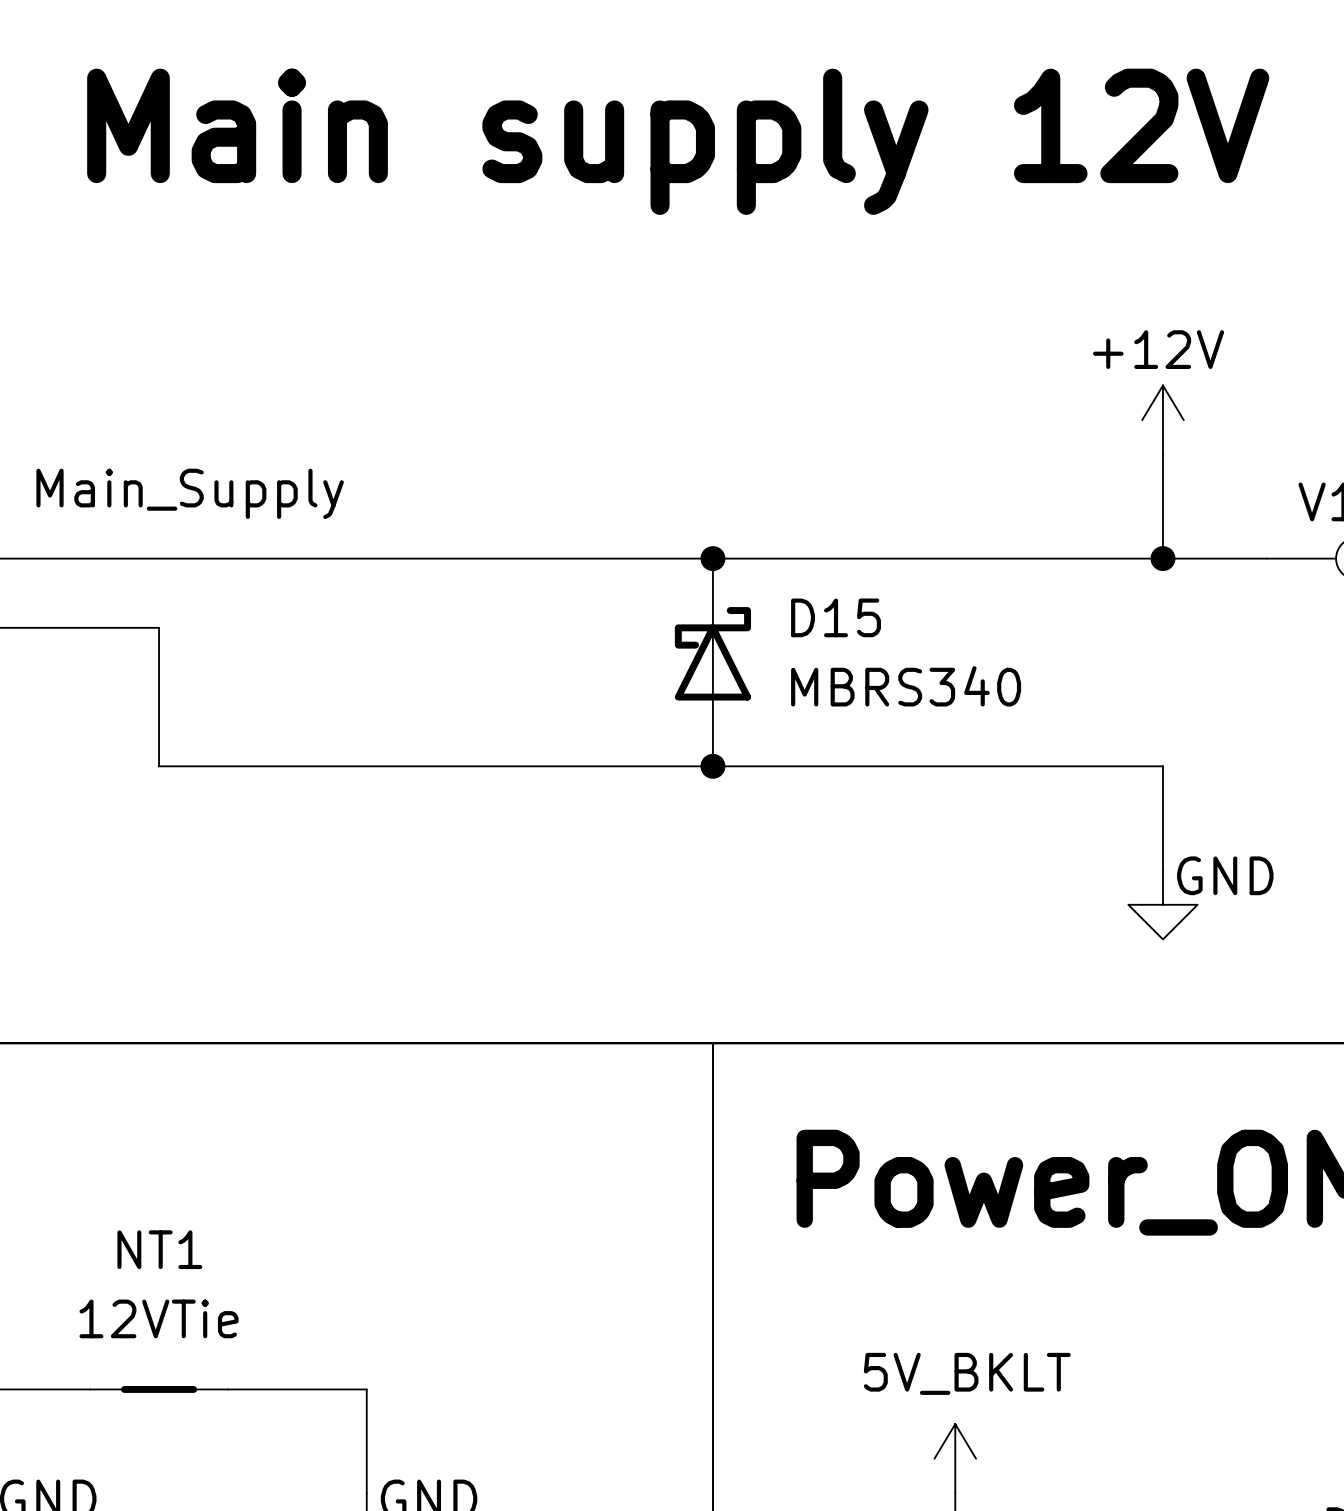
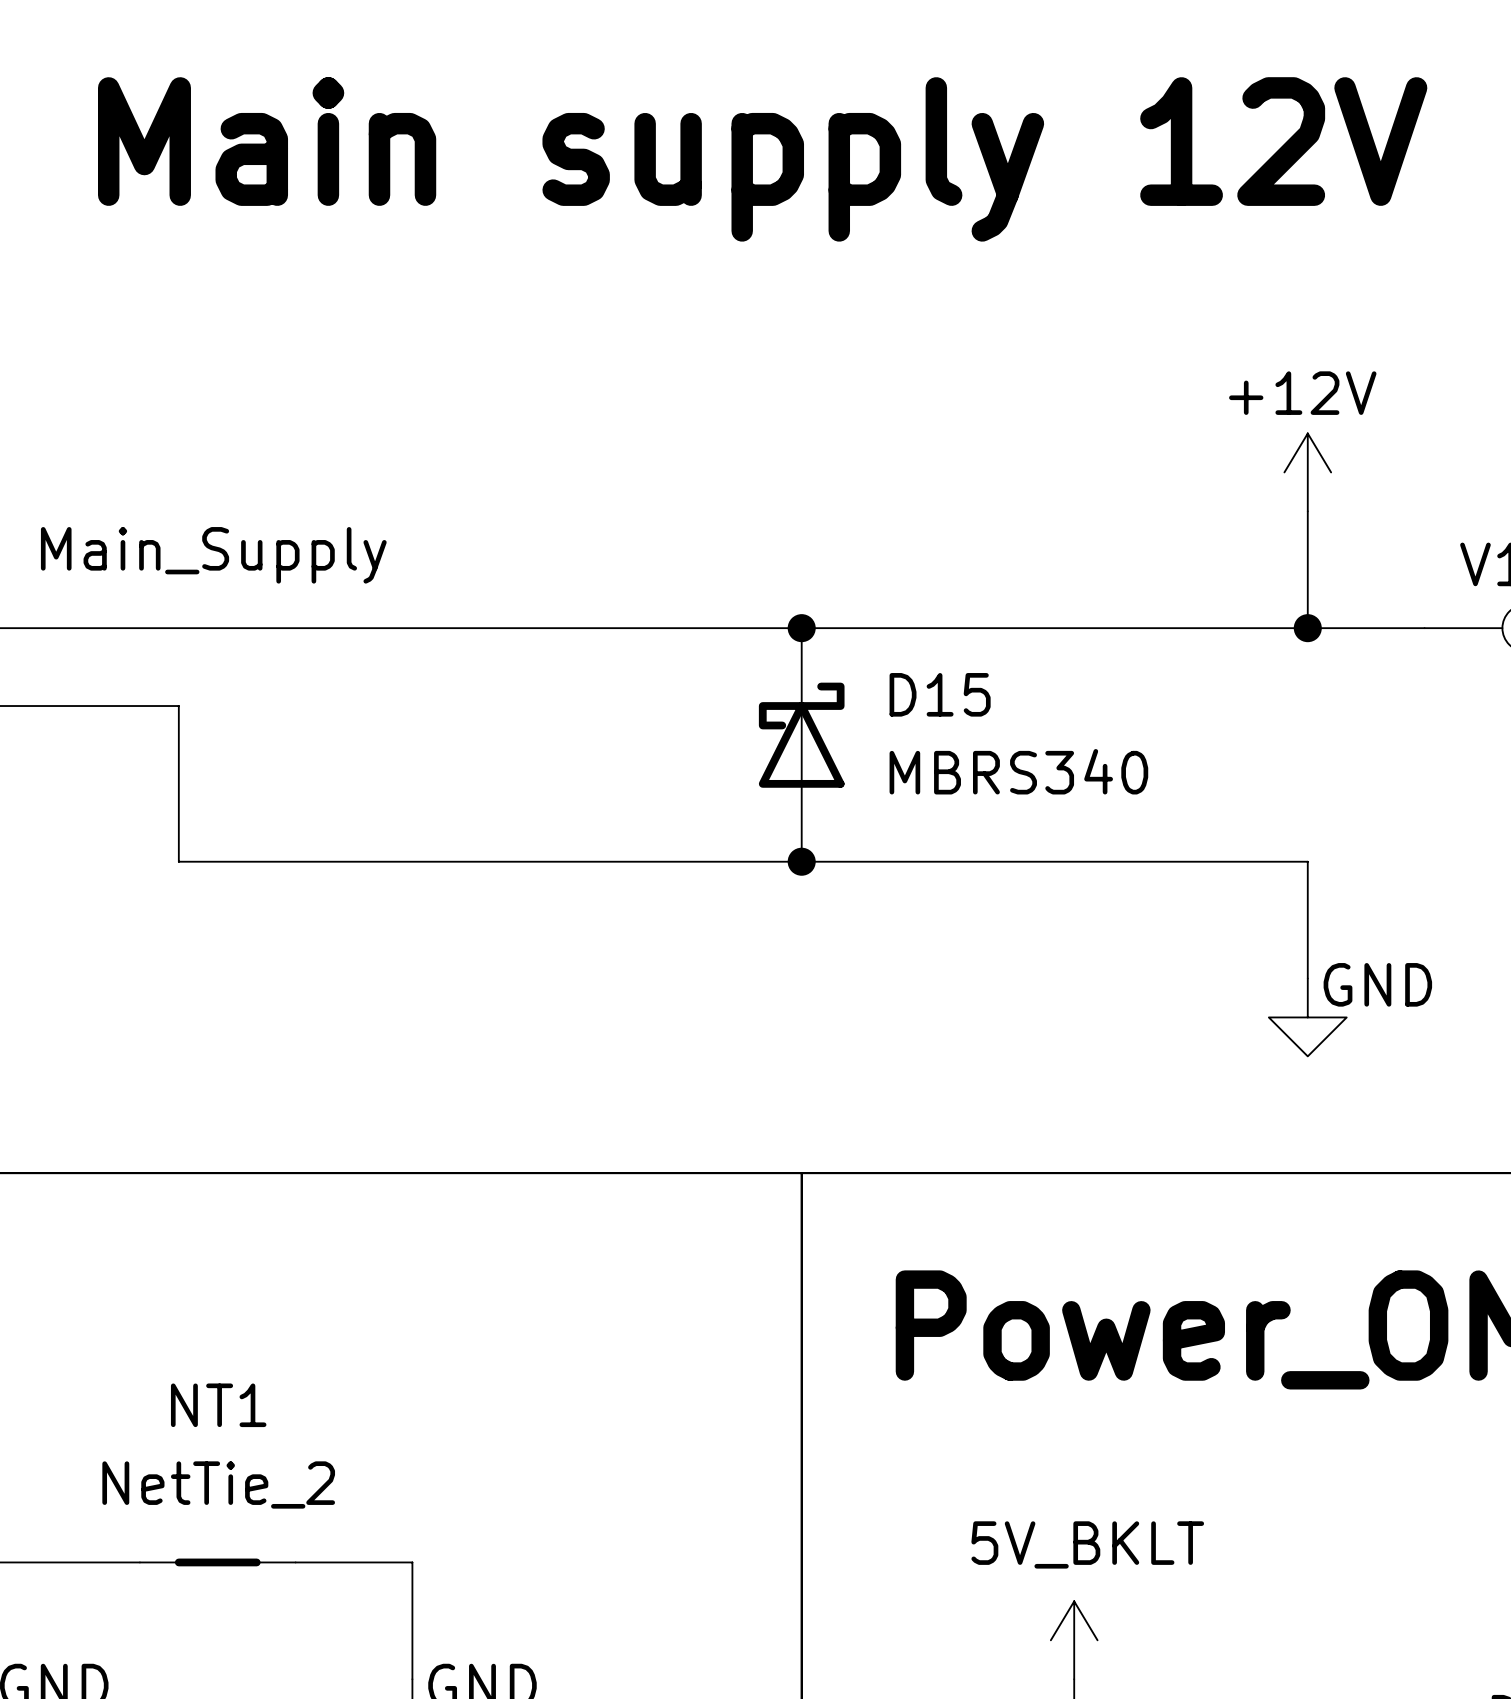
NT1 value: 12VTie (159, 1318) -> NetTie_2 (218, 1484)
NT1 position: (159, 1389) -> (217, 1562)

